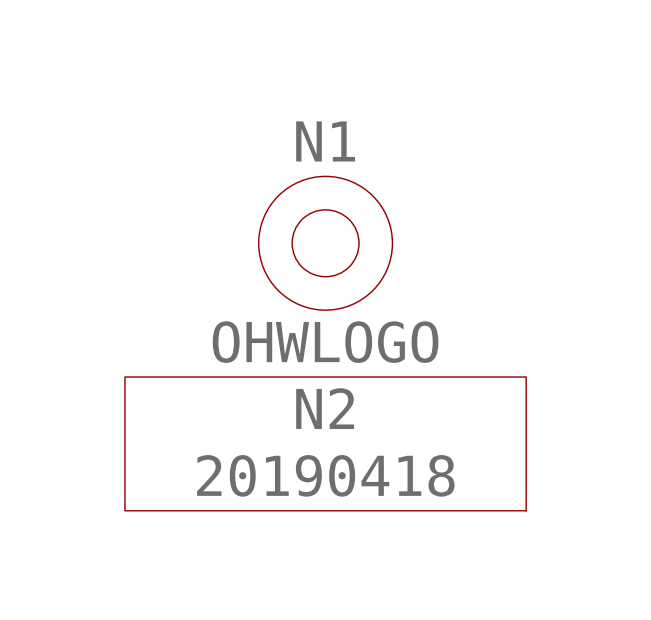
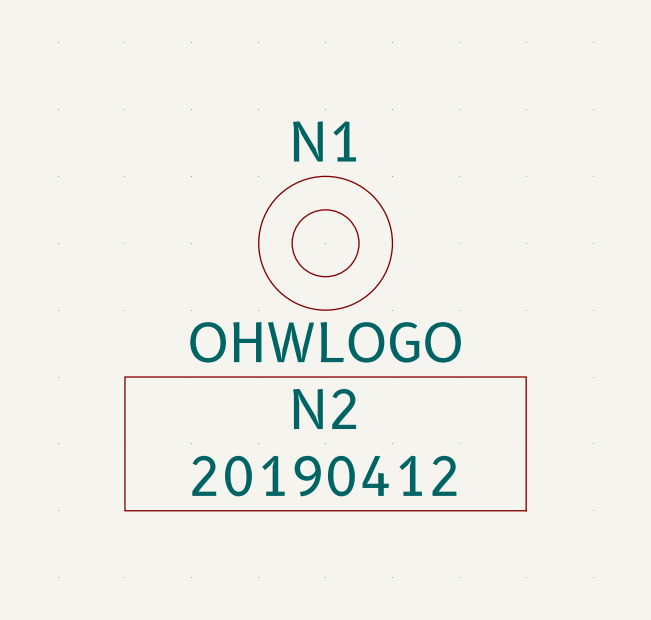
N2 value: 20190418 (325, 475) -> 20190412 (324, 476)

